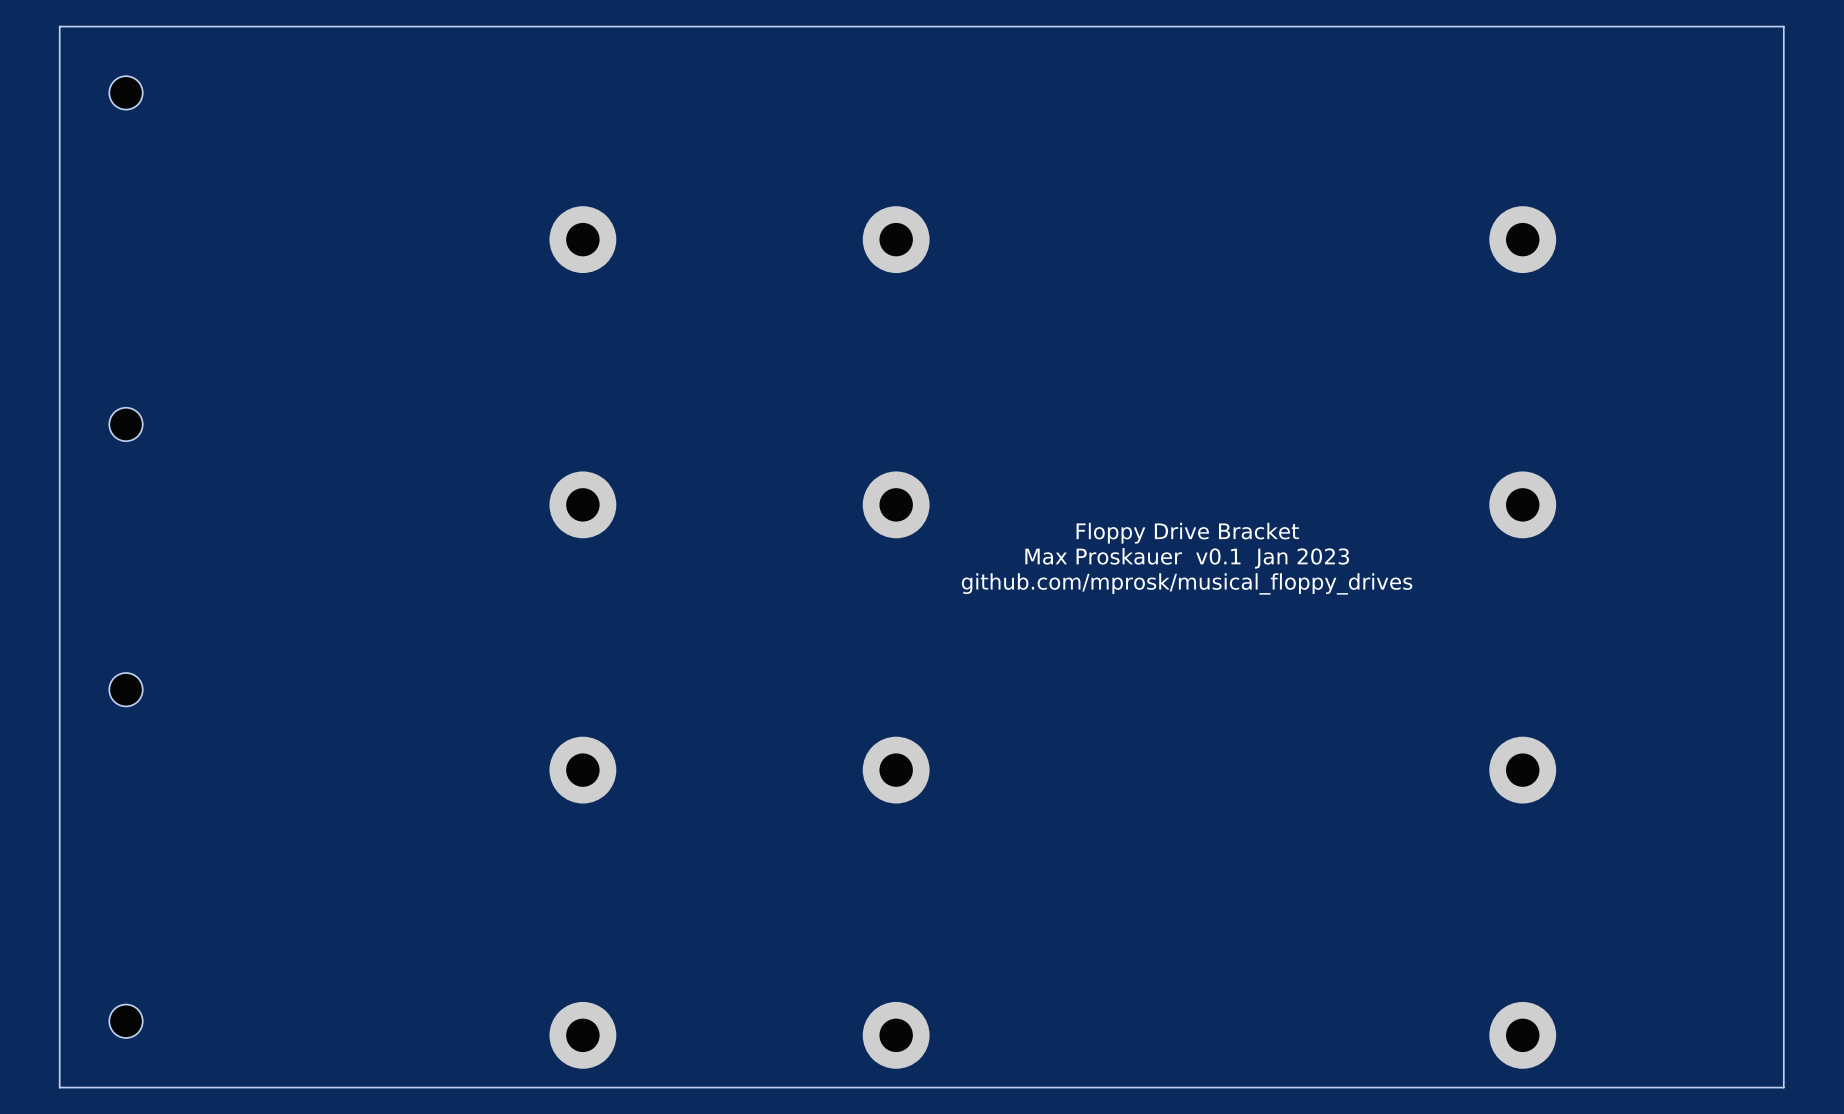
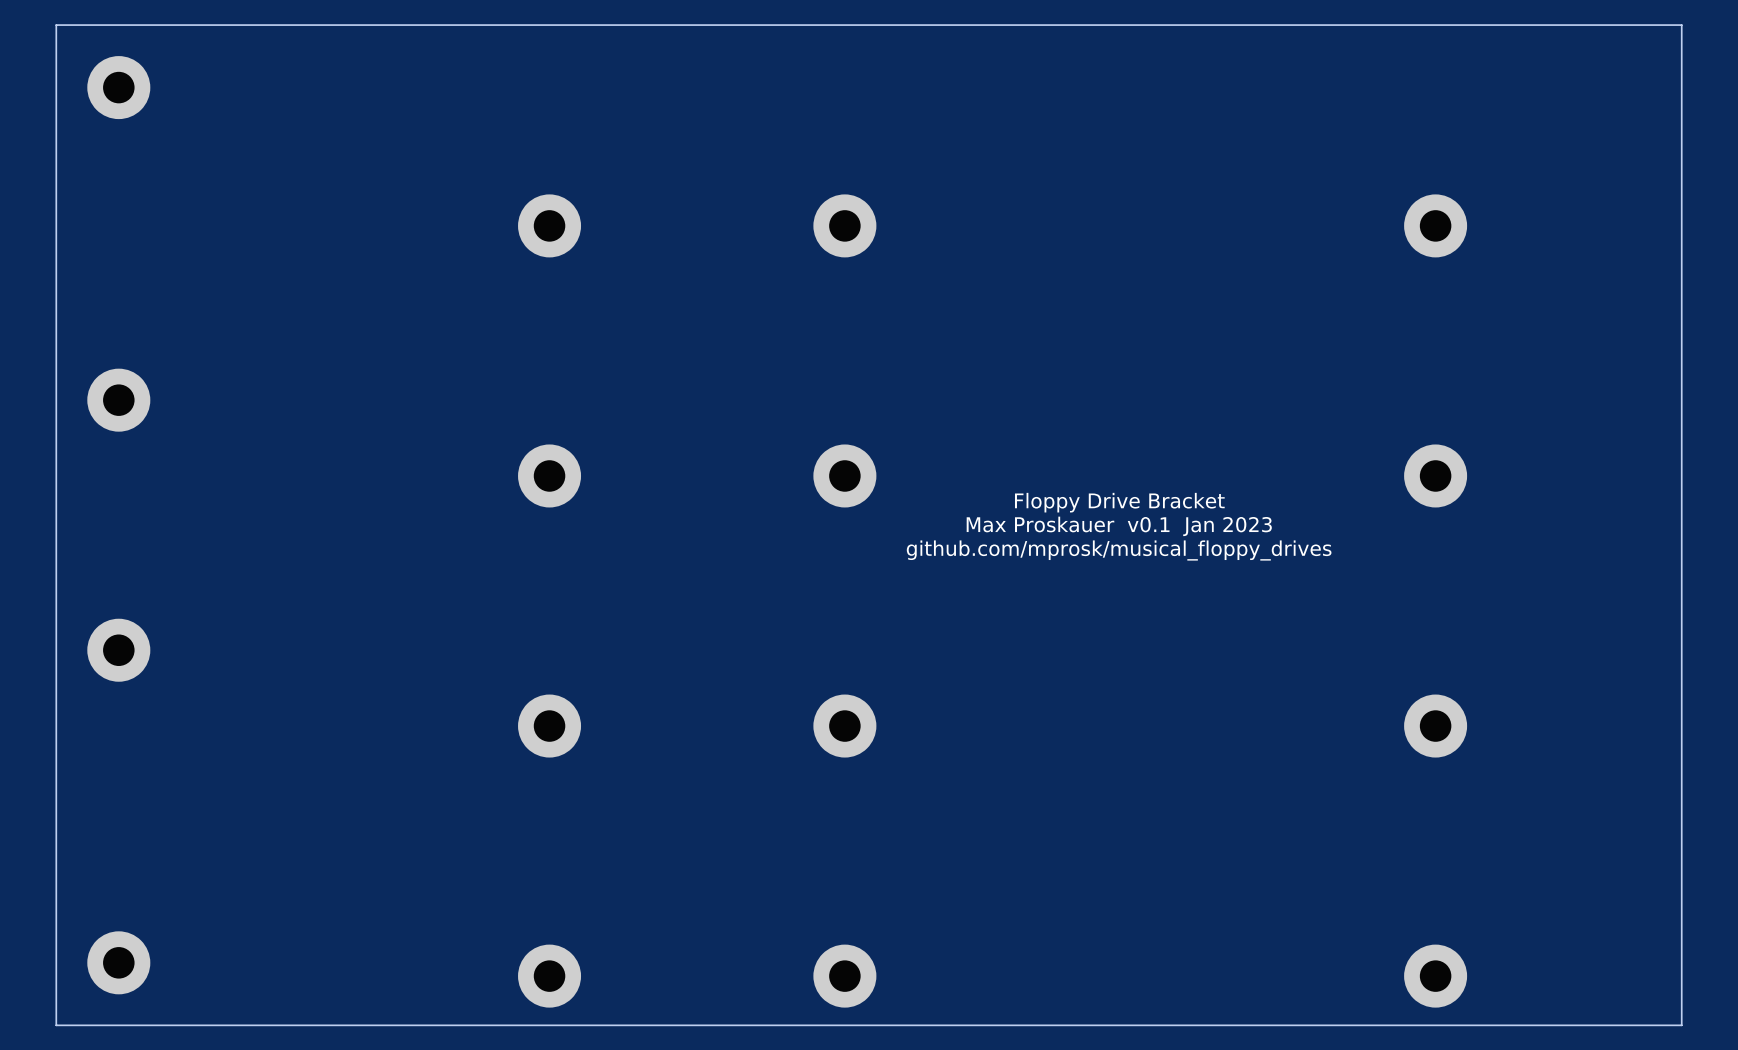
part footprint: [109, 76, 143, 110] -> [87, 56, 151, 120]
part footprint: [109, 407, 143, 442] -> [87, 368, 151, 432]
part footprint: [109, 672, 143, 707] -> [87, 618, 151, 682]
part footprint: [109, 1004, 143, 1038] -> [87, 931, 151, 995]

